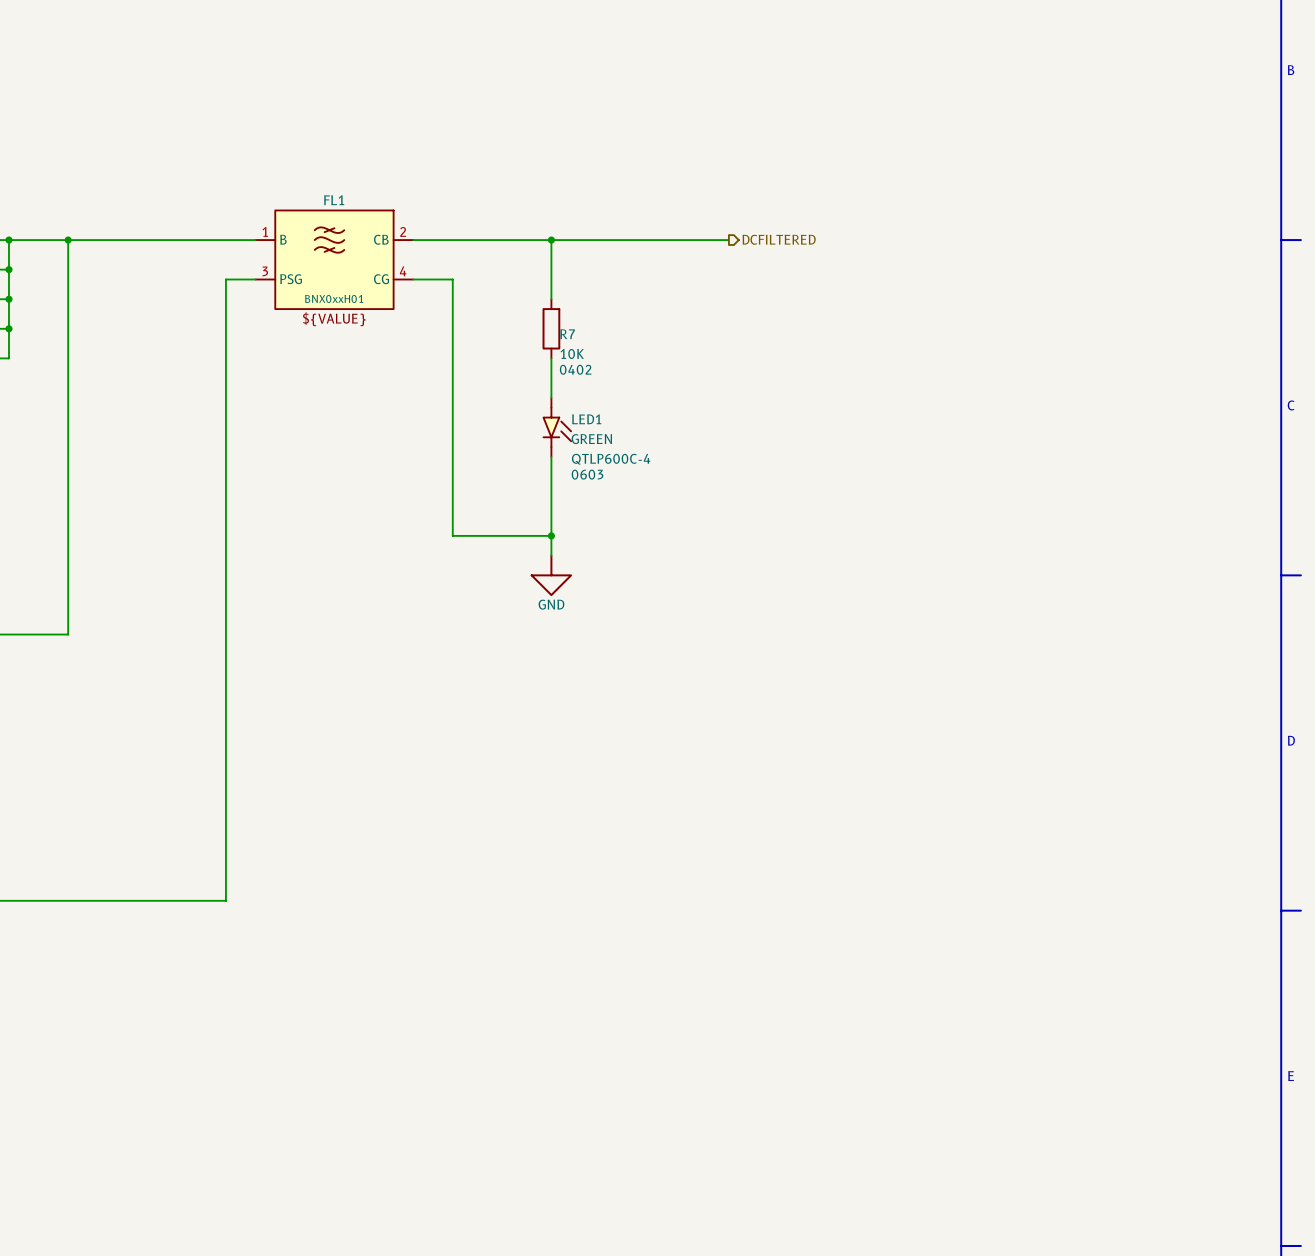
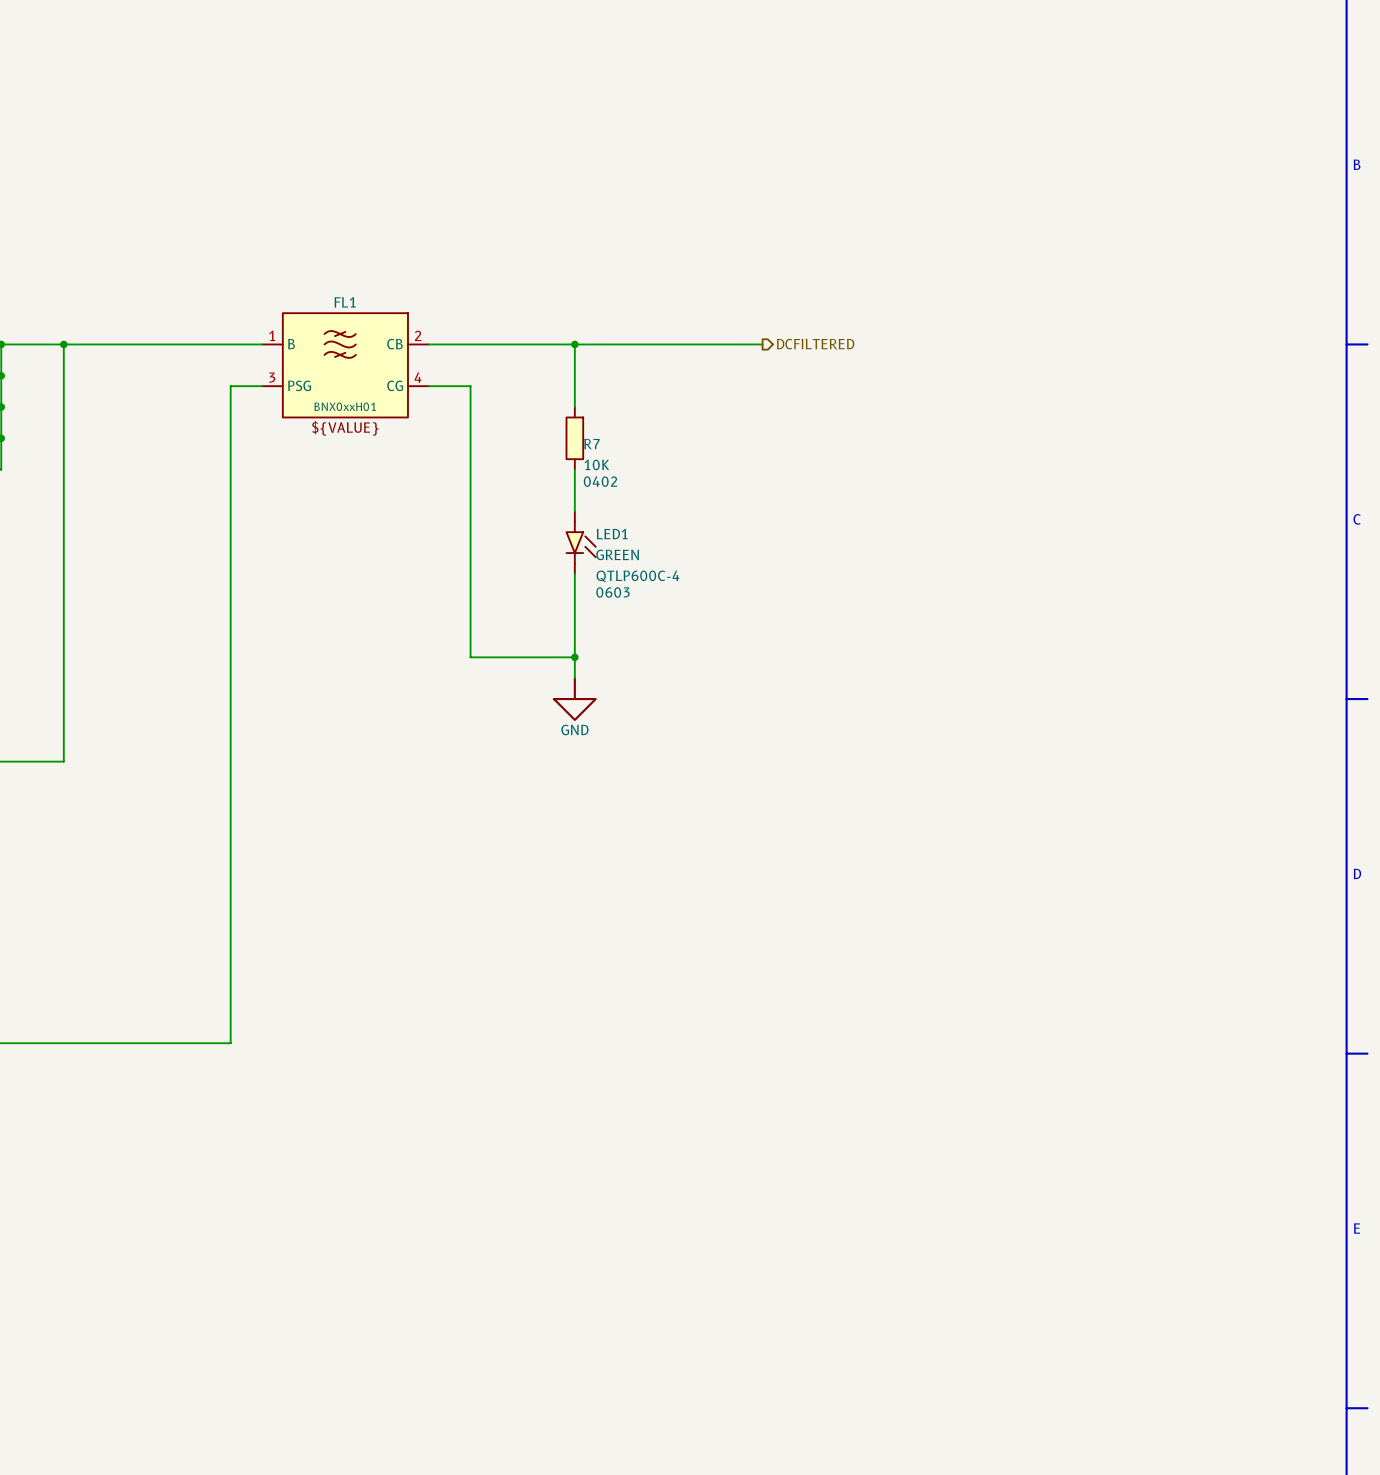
R7 symbol: [542, 299, 561, 359] -> [566, 407, 584, 470]

